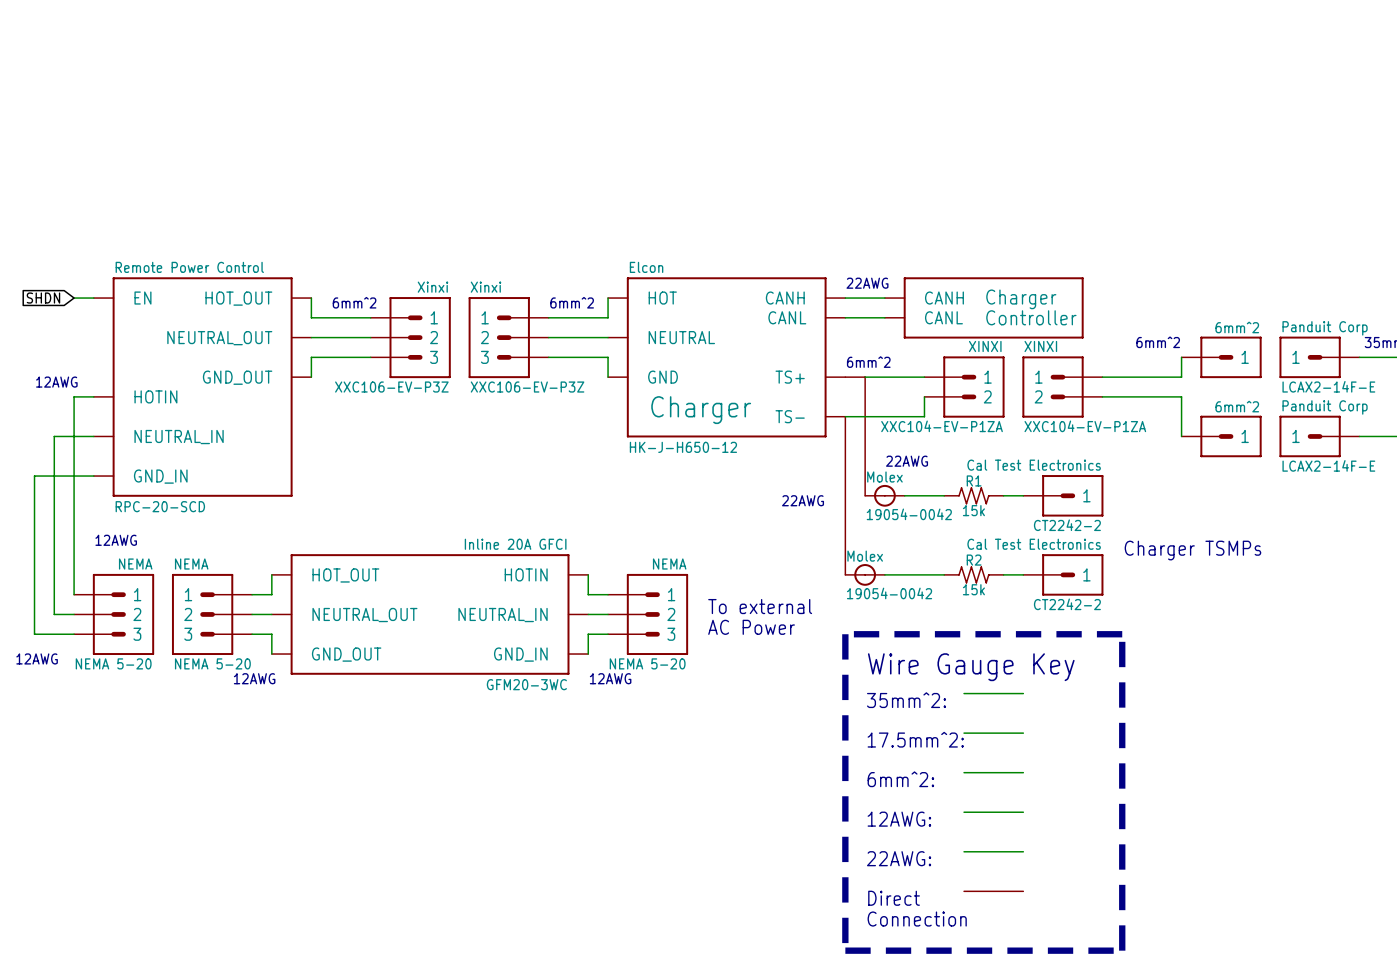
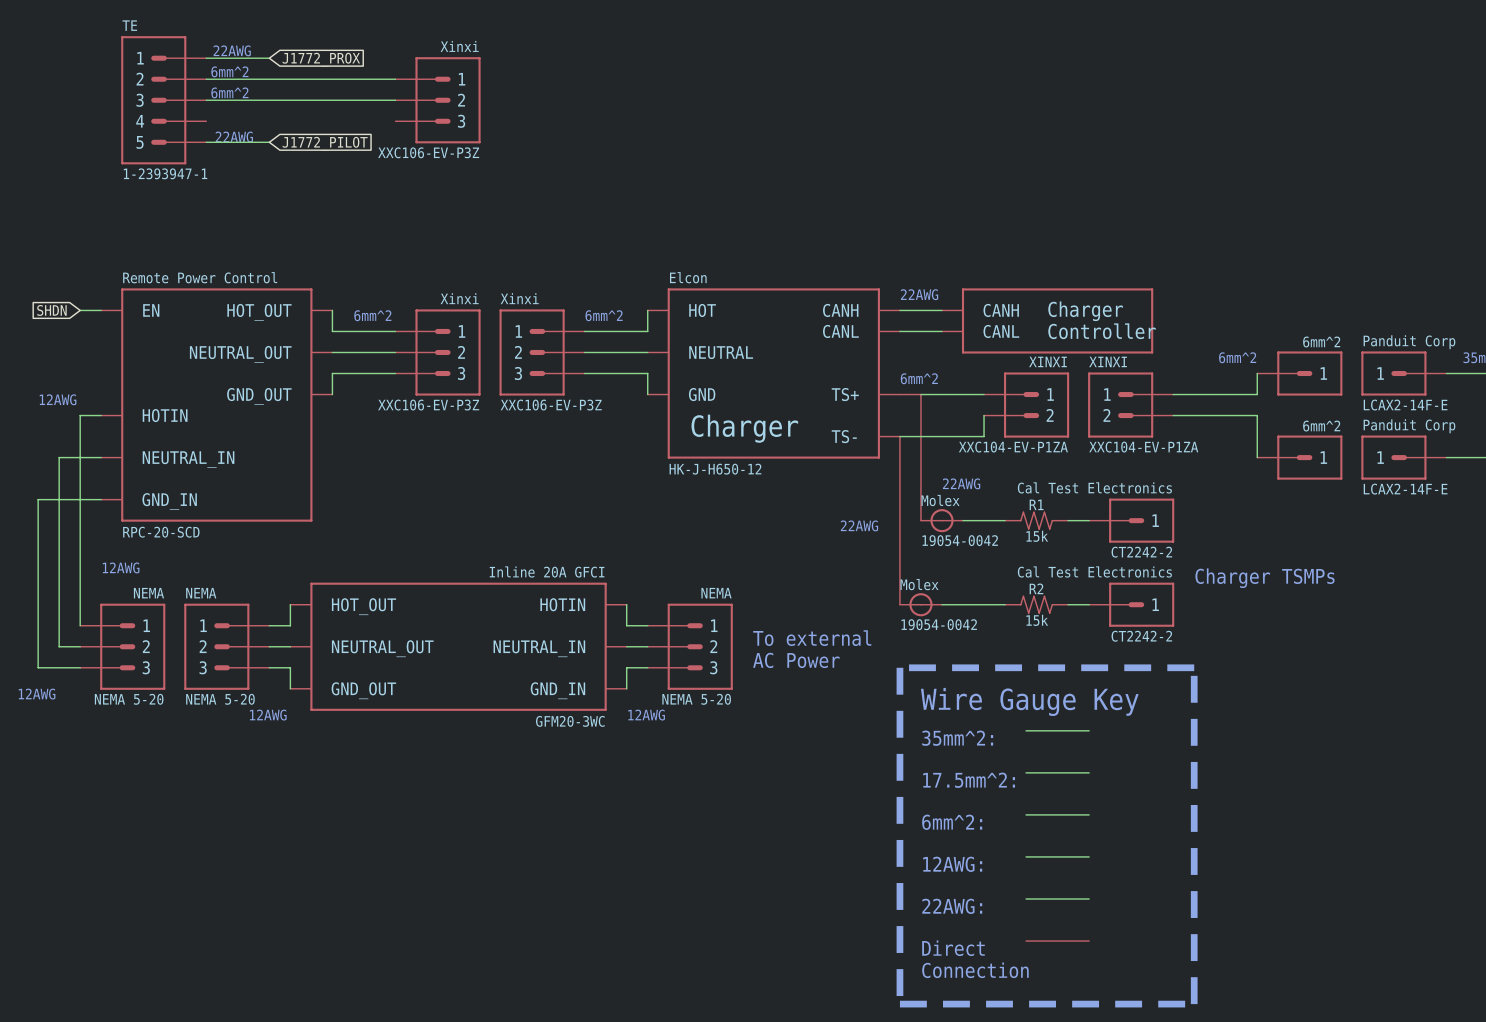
text: none -> 22AWG (232, 50)
wire: none -> (206, 58) (269, 58)
global label: none -> J1772_PROX (321, 59)
text: none -> 6mm^2 (229, 71)
wire: none -> (206, 79) (395, 79)
text: none -> 6mm^2 (229, 92)
part: none -> (163, 100)
wire: none -> (206, 100) (395, 100)
part: none -> (438, 100)
text: none -> 22AWG (234, 137)
wire: none -> (206, 142) (269, 142)
global label: none -> J1772_PILOT (325, 143)

